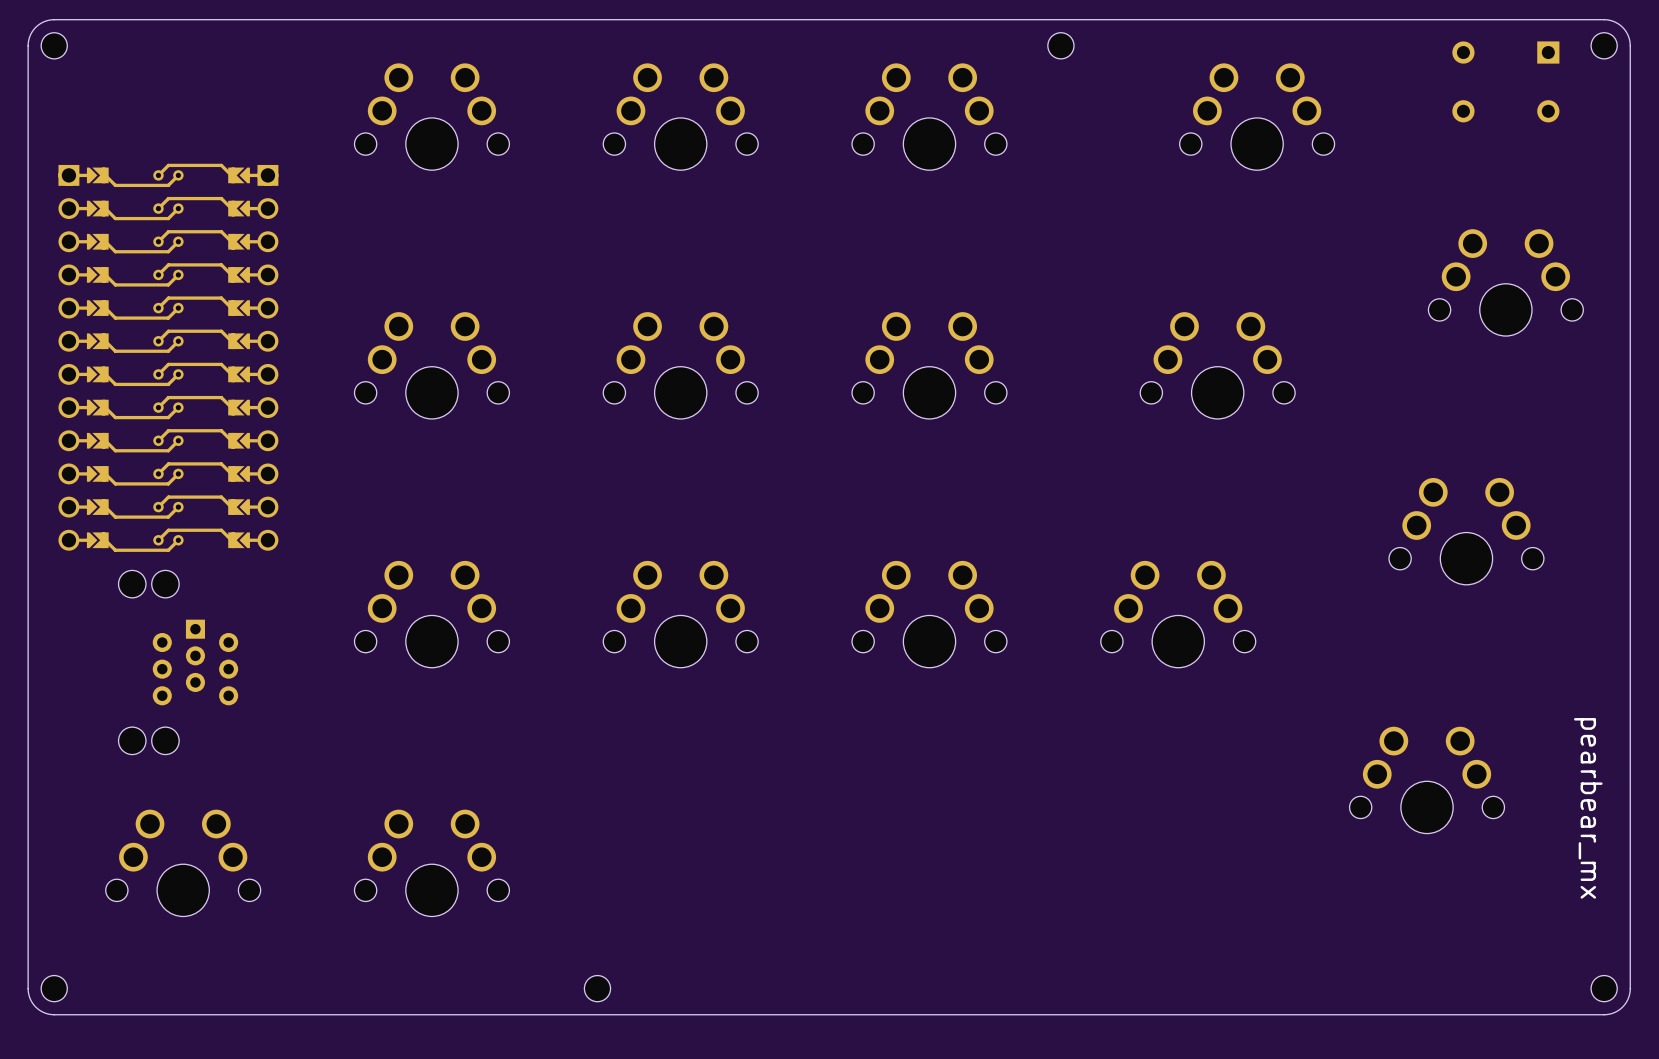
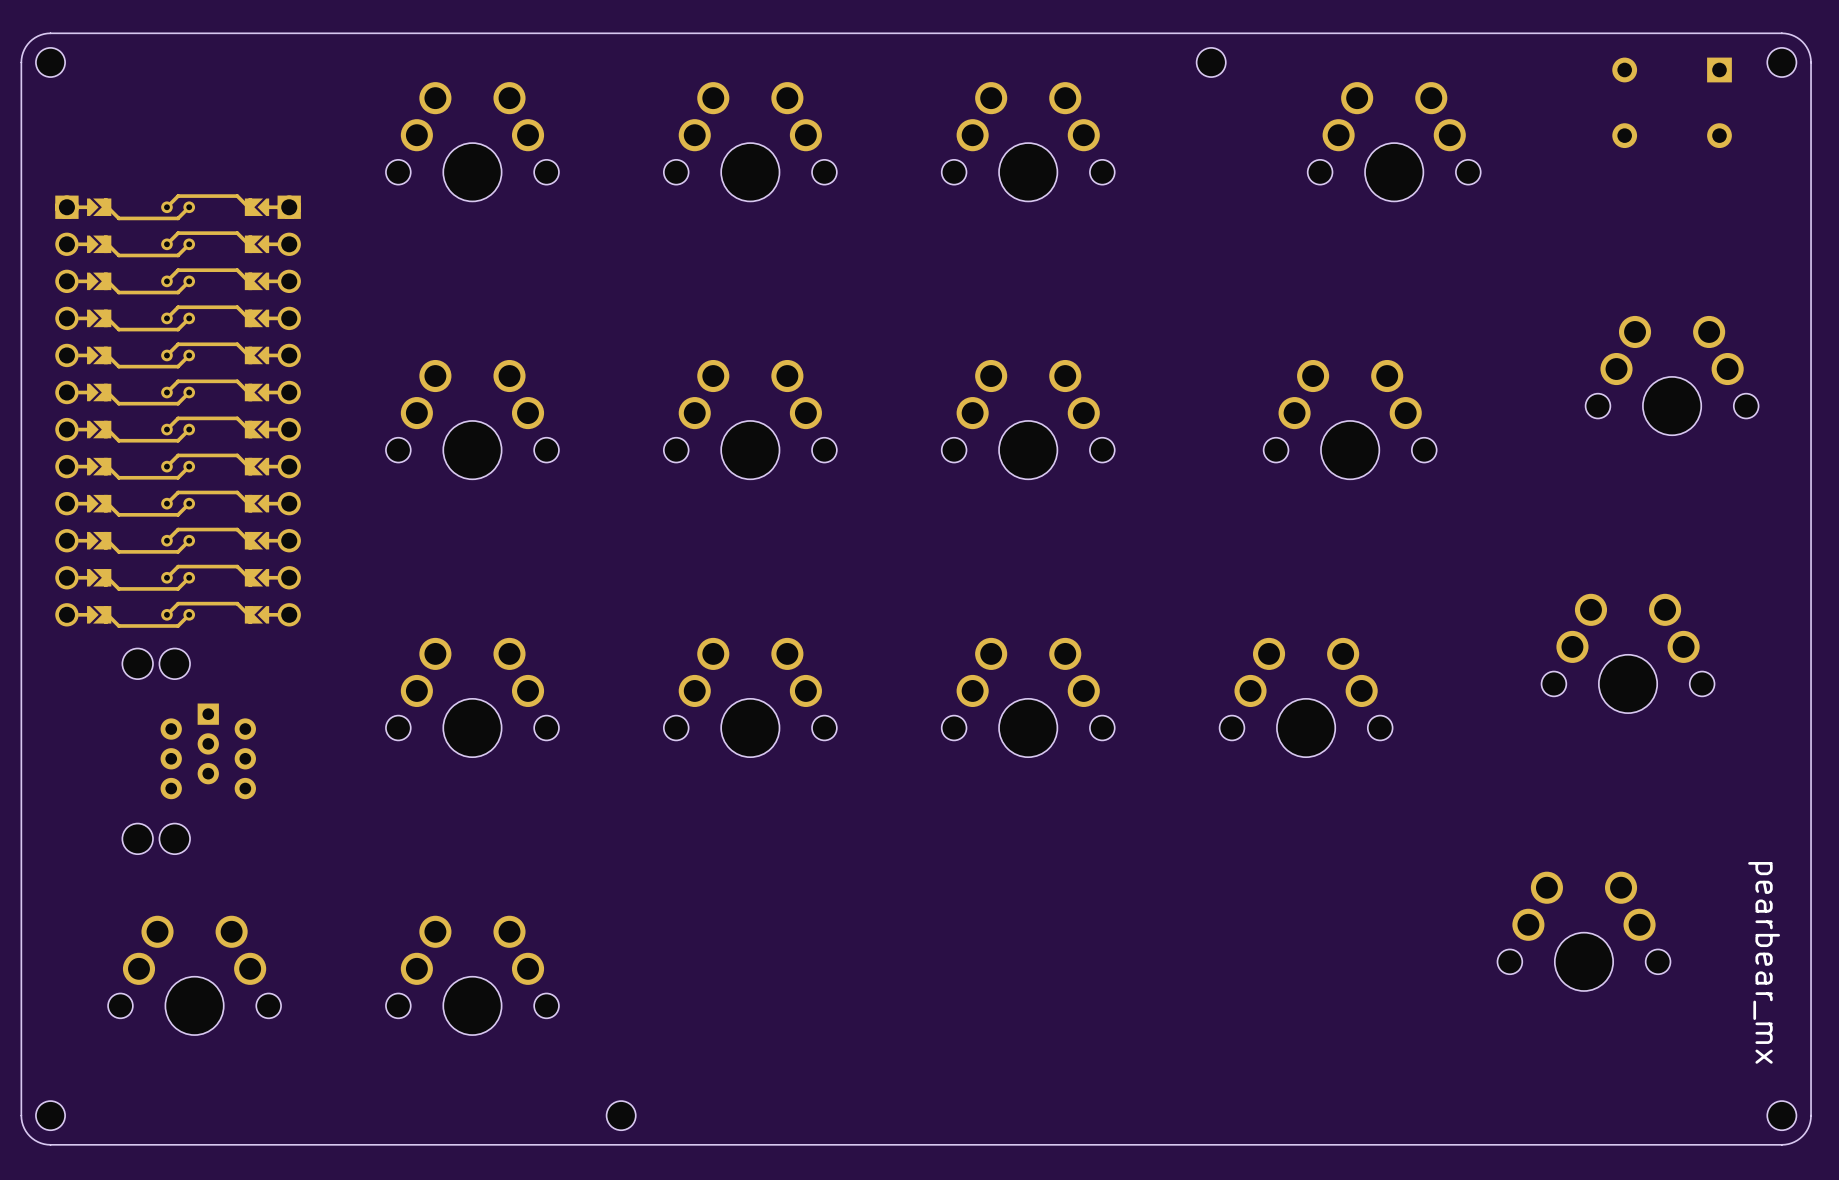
part position: (1060, 45) -> (1211, 62)
part position: (1505, 282) -> (1672, 375)
part position: (1466, 531) -> (1628, 653)
part position: (1427, 780) -> (1583, 931)
text position: pearbear_mx (1588, 808) -> pearbear_mx (1764, 962)
part position: (597, 988) -> (621, 1115)

